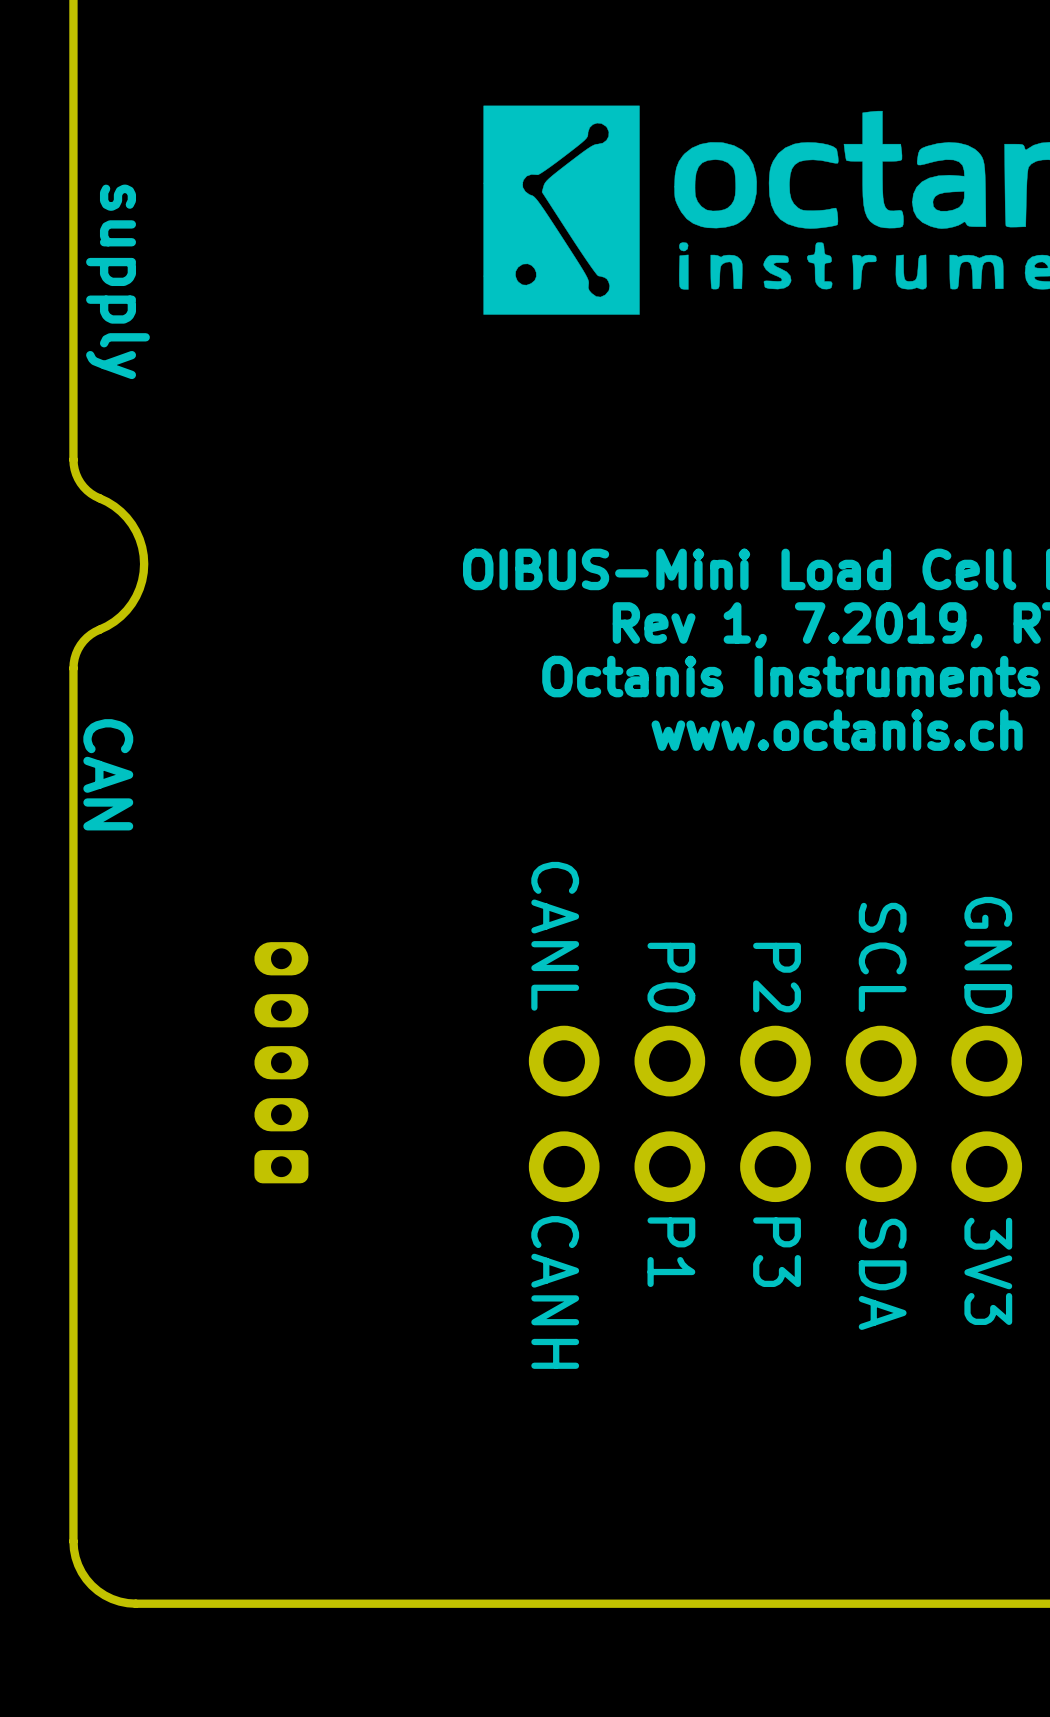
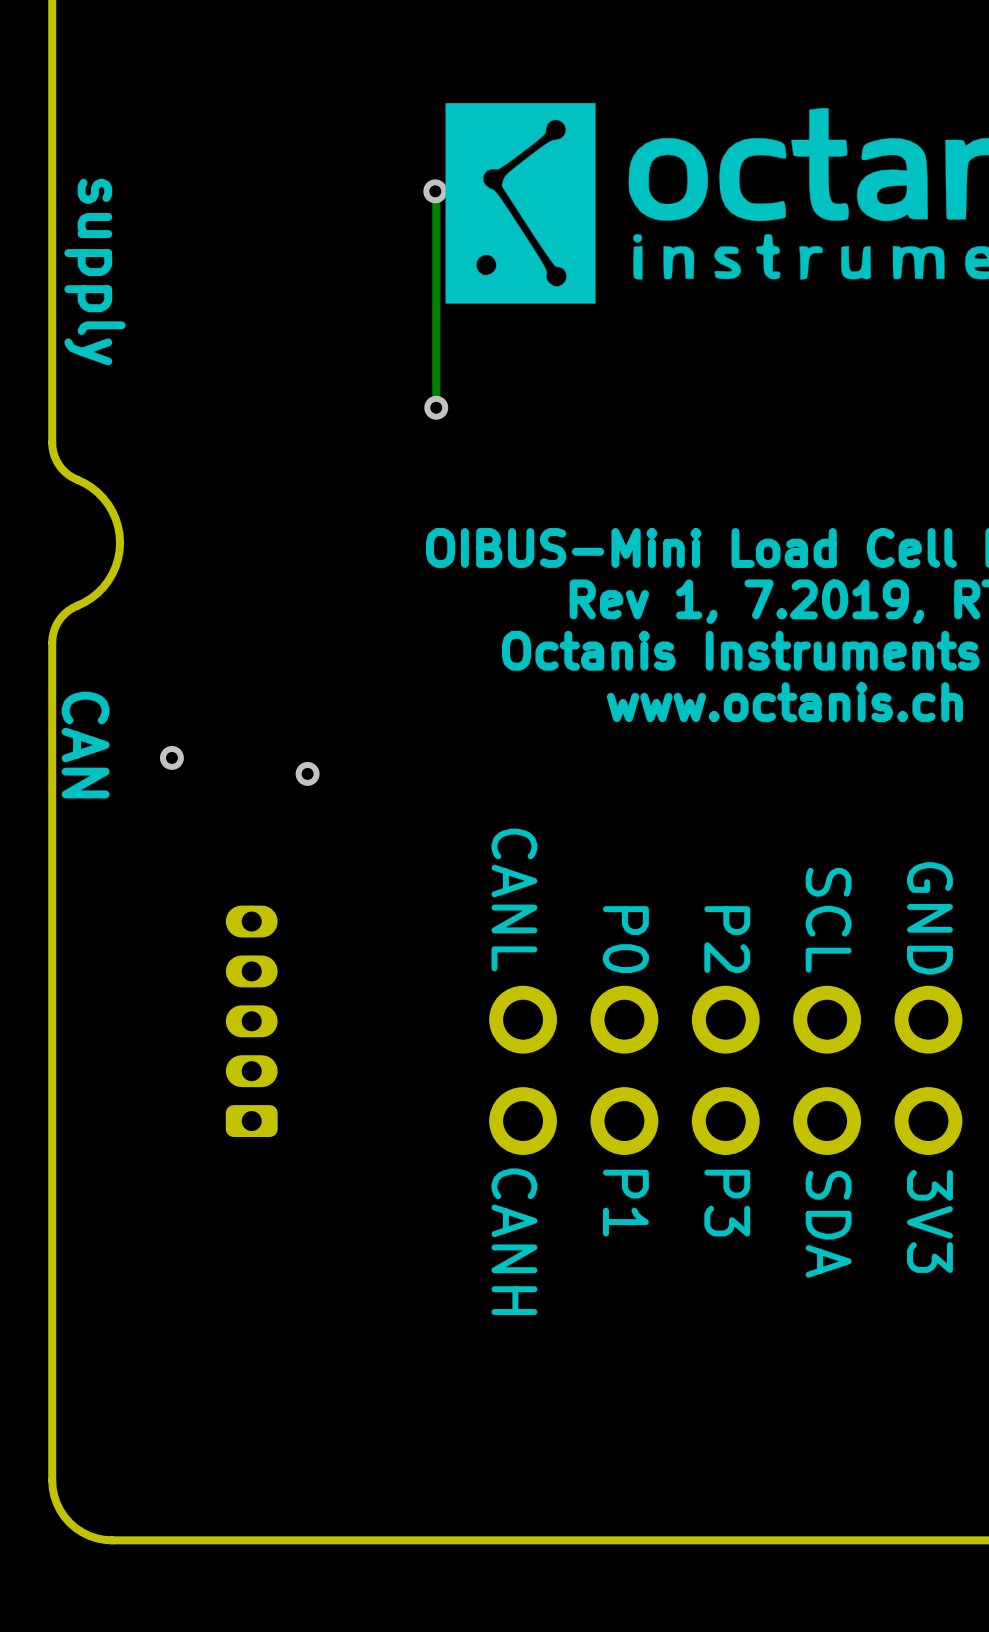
track: none -> (435, 191) (436, 407)
via: none -> (435, 191)
via: none -> (436, 407)
via: none -> (171, 757)
via: none -> (307, 773)

